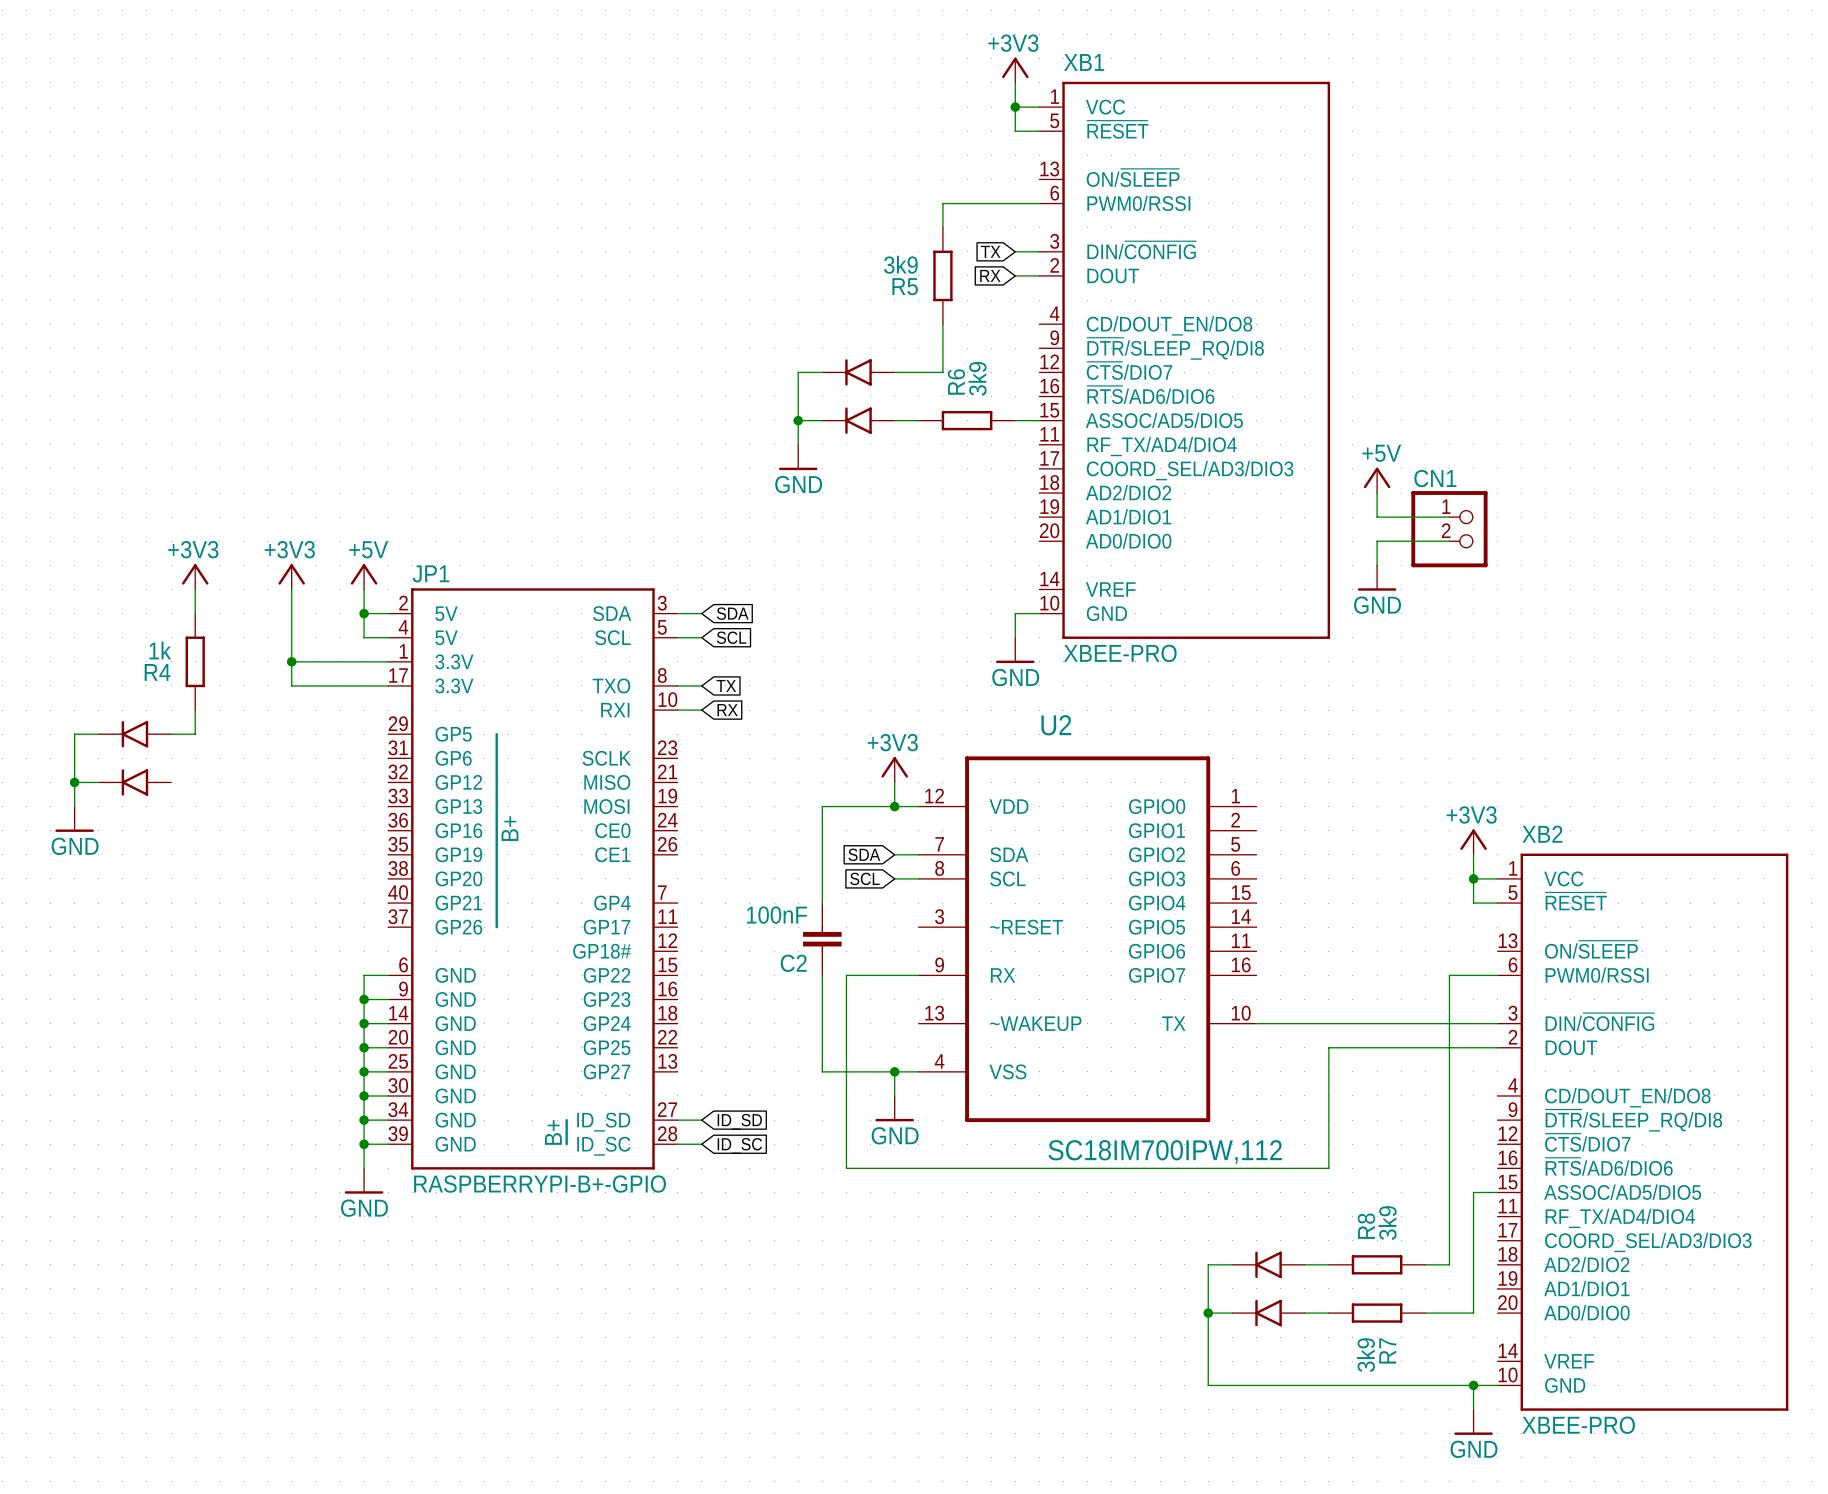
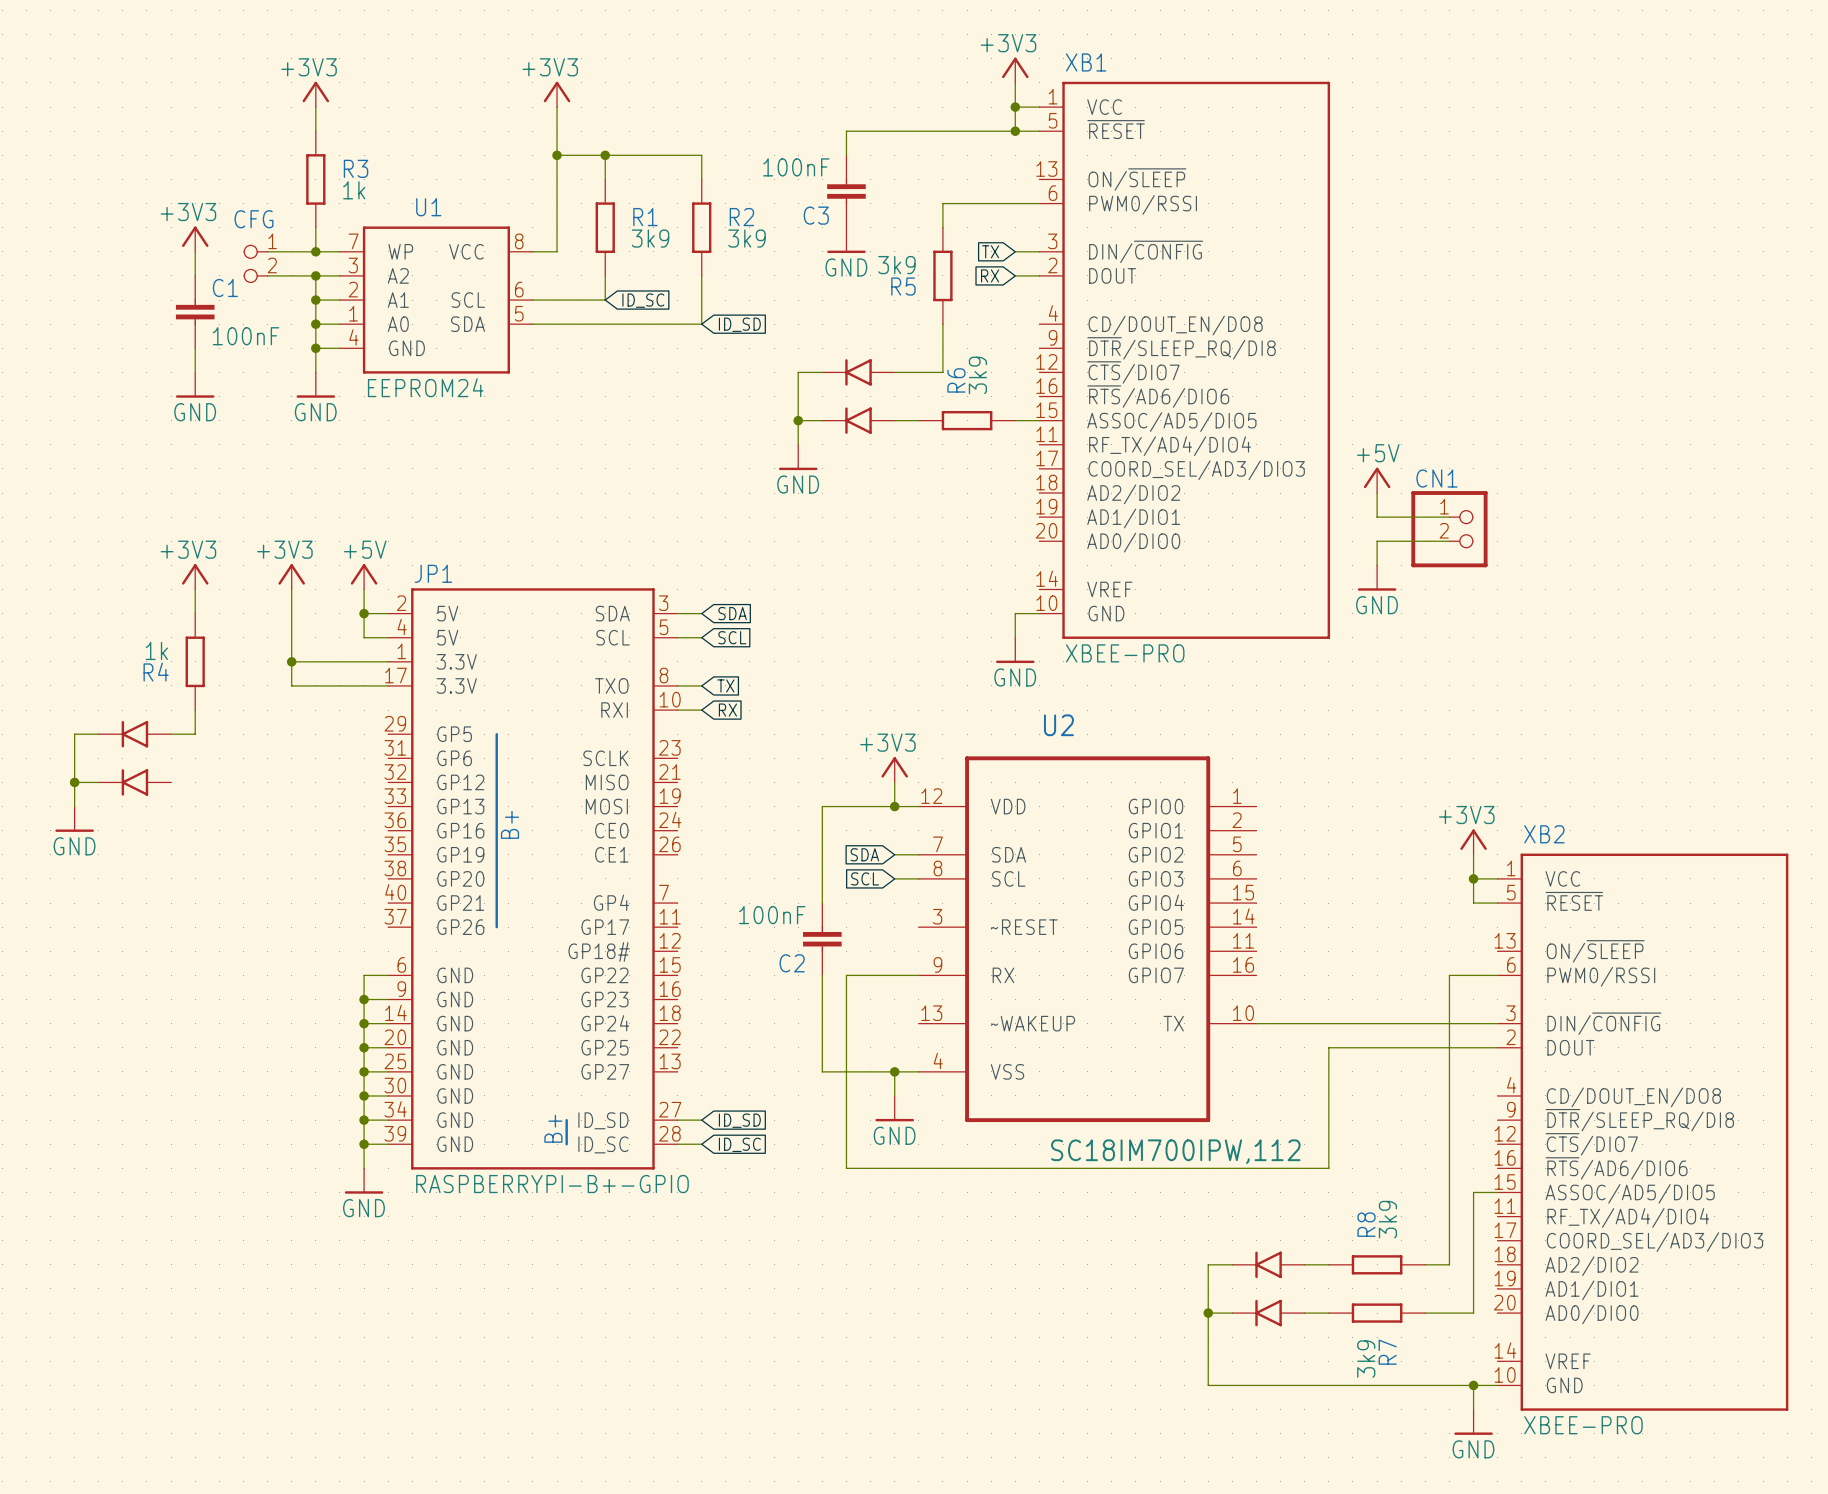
power symbol: none -> +3V3 (315, 94)
power symbol: none -> +3V3 (557, 94)
wire: none -> (315, 107) (315, 131)
wire: none -> (557, 107) (557, 251) (532, 251)
wire: none -> (1015, 131) (846, 131) (846, 155)
junction: none -> (1015, 131)
wire: none -> (557, 155) (701, 155) (701, 179)
junction: none -> (557, 155)
wire: none -> (605, 155) (605, 179)
junction: none -> (605, 155)
R3: none -> 1k (315, 179)
C3: none -> 100nF (846, 191)
wire: none -> (315, 227) (315, 251)
R1: none -> 3k9 (605, 227)
R2: none -> 3k9 (701, 227)
power symbol: none -> +3V3 (195, 239)
power symbol: none -> GND (846, 240)
wire: none -> (195, 251) (195, 275)
wire: none -> (267, 251) (339, 251)
junction: none -> (315, 251)
CFG: none -> (255, 263)
wire: none -> (267, 275) (339, 275)
wire: none -> (315, 275) (315, 372)
junction: none -> (315, 275)
wire: none -> (605, 275) (605, 300) (532, 300)
wire: none -> (701, 275) (701, 324) (532, 324)
wire: none -> (315, 300) (339, 300)
junction: none -> (315, 300)
U1: none -> EEPROM24 (436, 300)
global label: none -> ID_SC (643, 300)
C1: none -> 100nF (195, 312)
wire: none -> (315, 324) (339, 324)
junction: none -> (315, 324)
global label: none -> ID_SD (739, 324)
wire: none -> (195, 348) (195, 372)
wire: none -> (315, 348) (339, 348)
junction: none -> (315, 348)
power symbol: none -> GND (195, 385)
power symbol: none -> GND (315, 385)

